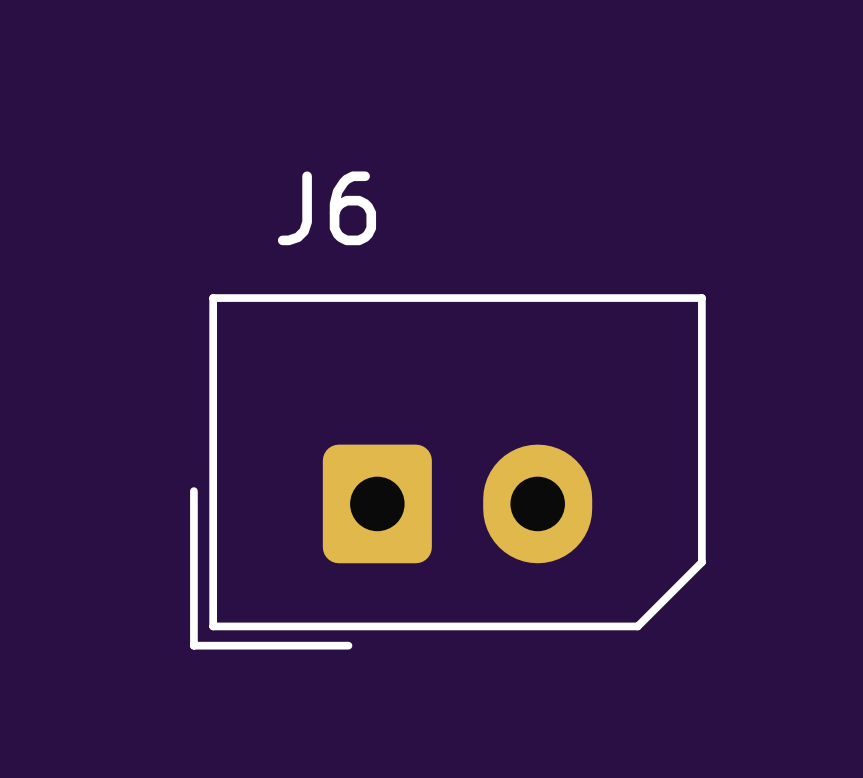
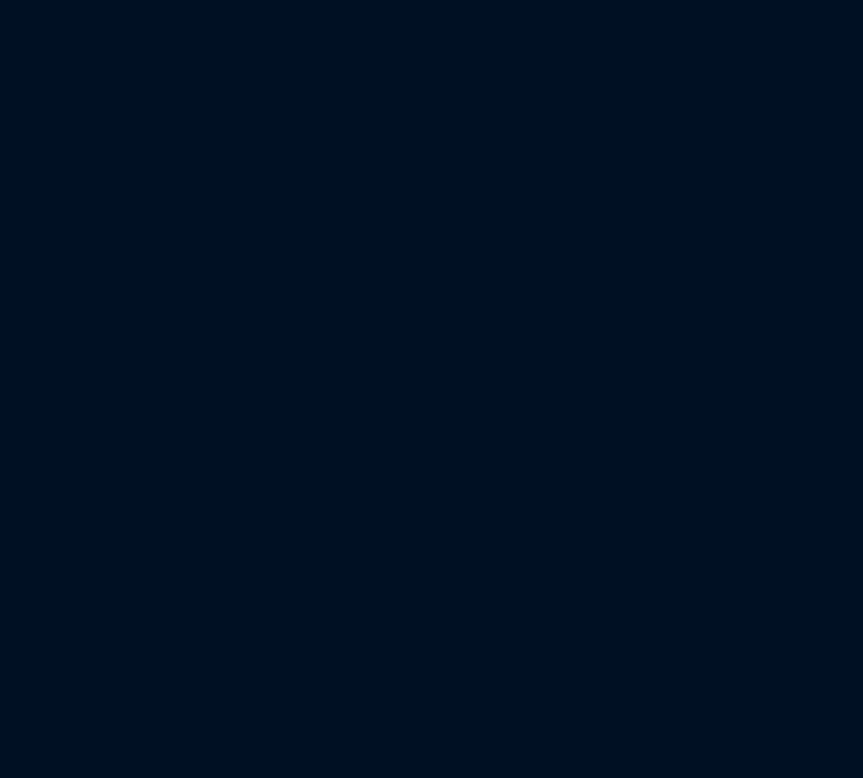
J6: (447, 471) -> none

